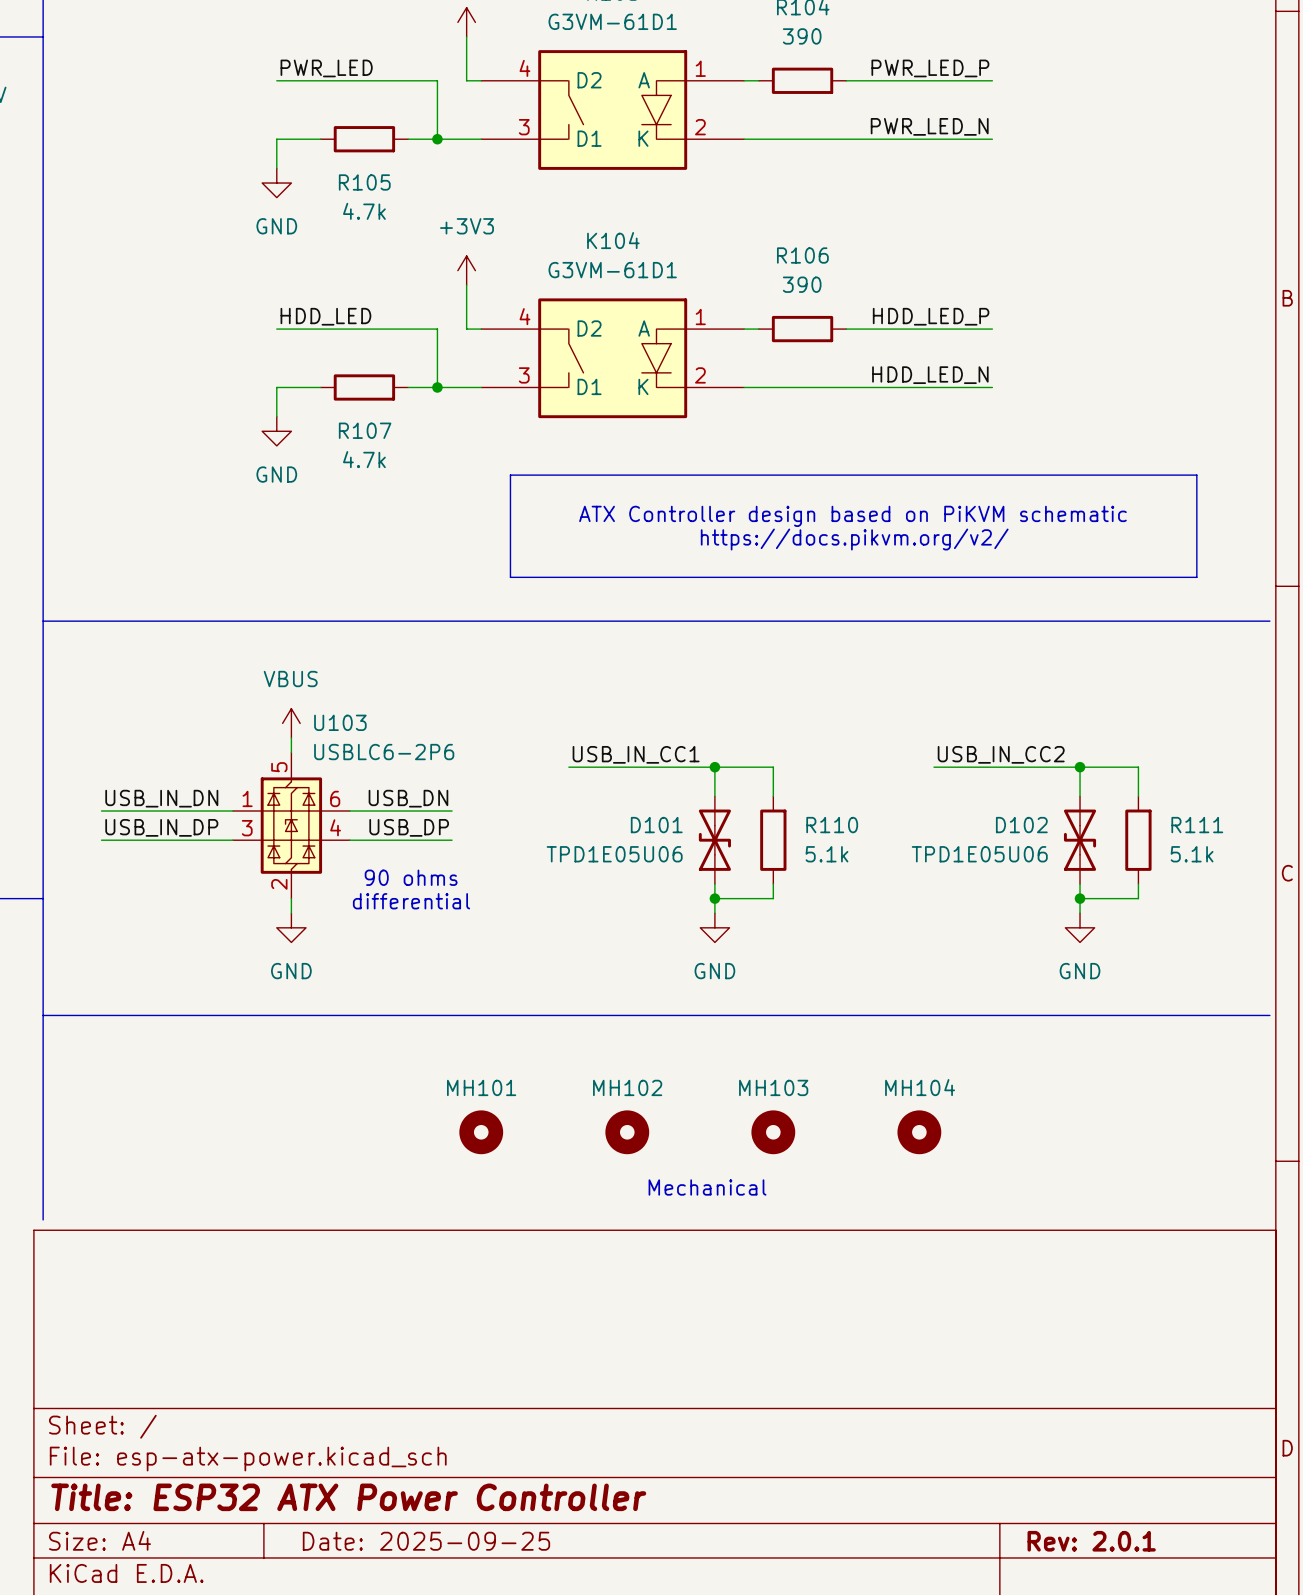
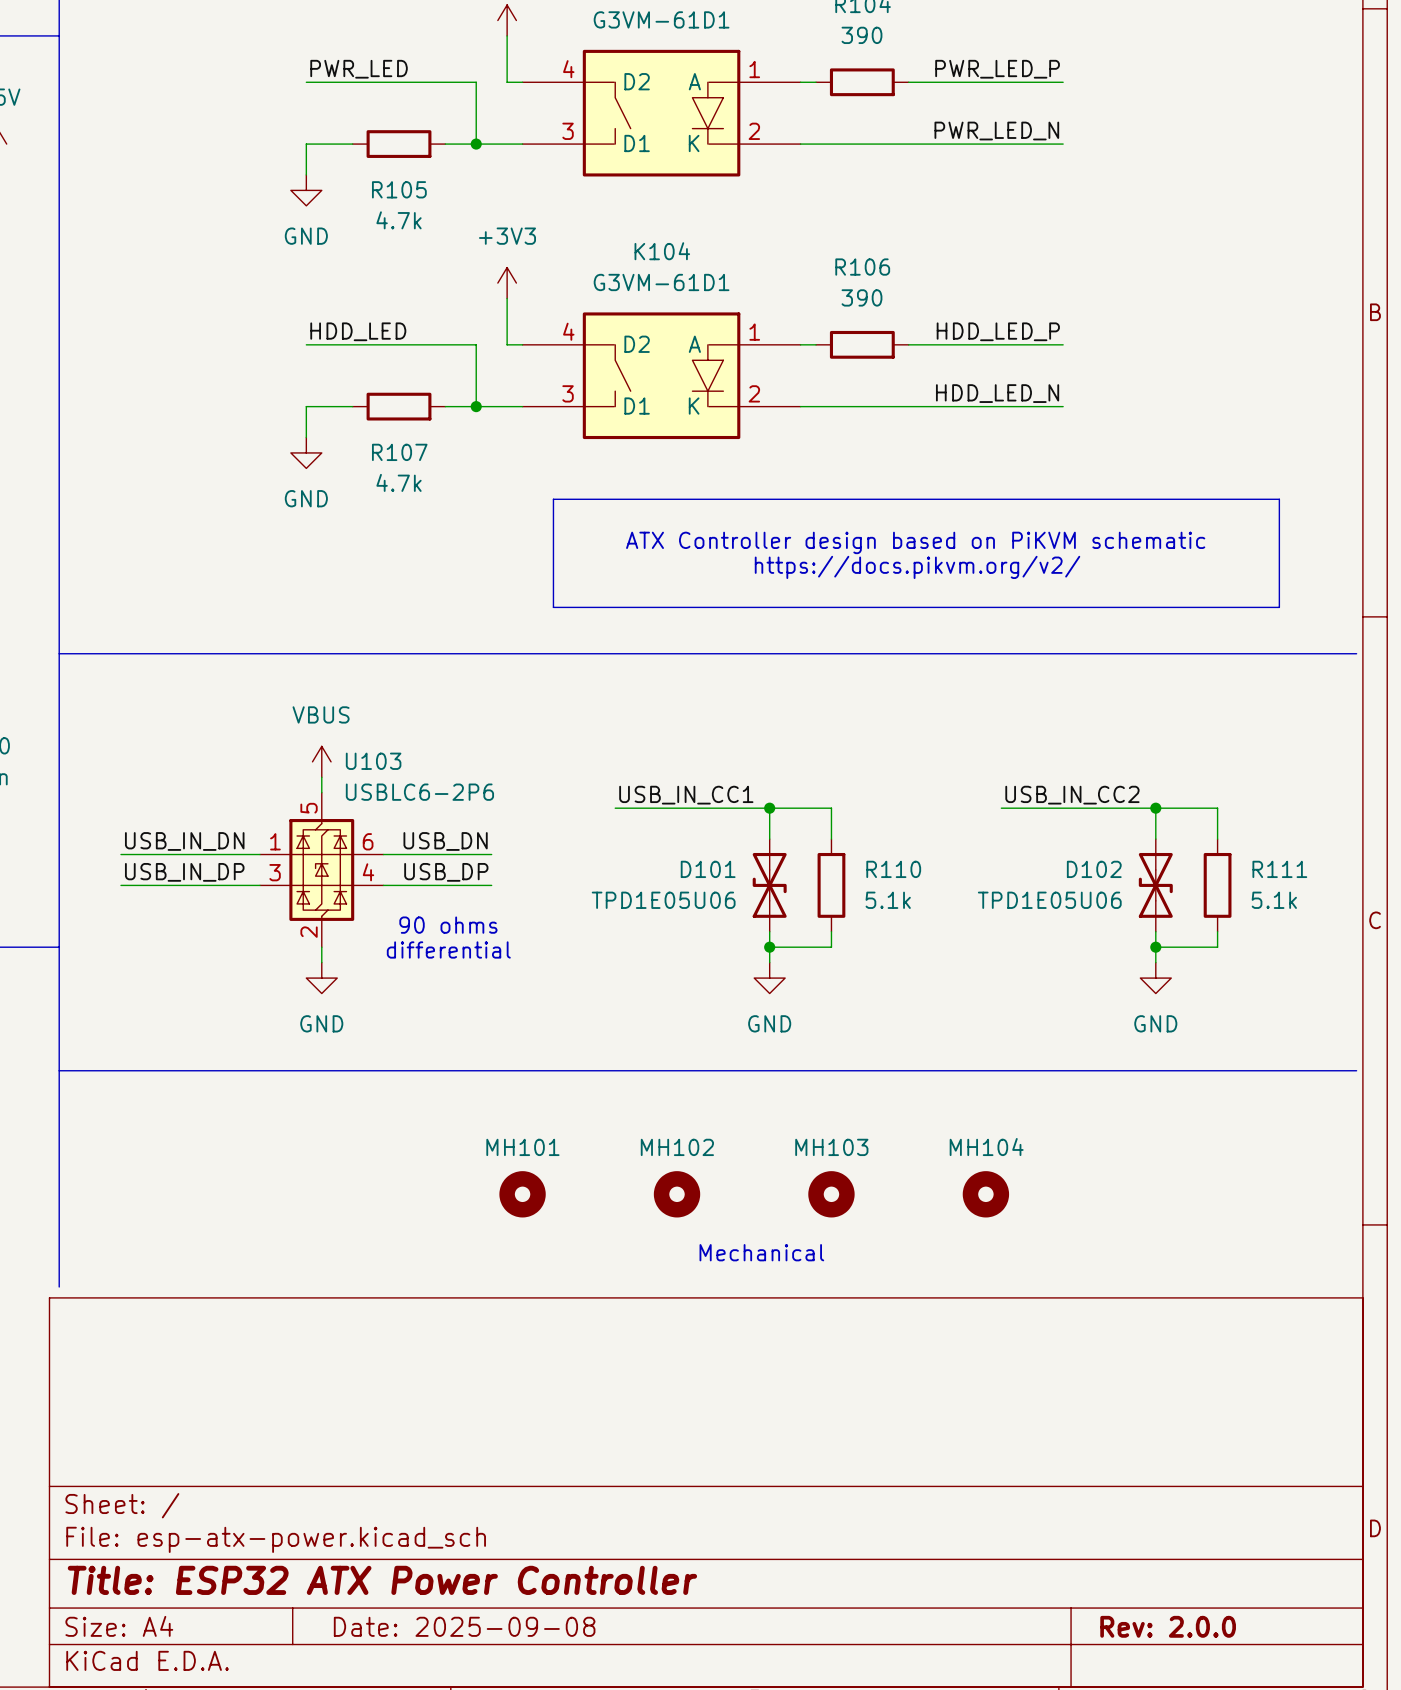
title block: Date: 2025-09-25 (426, 1541) -> Date: 2025-09-08 (464, 1626)
title block: Rev: 2.0.1 (1091, 1541) -> Rev: 2.0.0 (1168, 1626)

